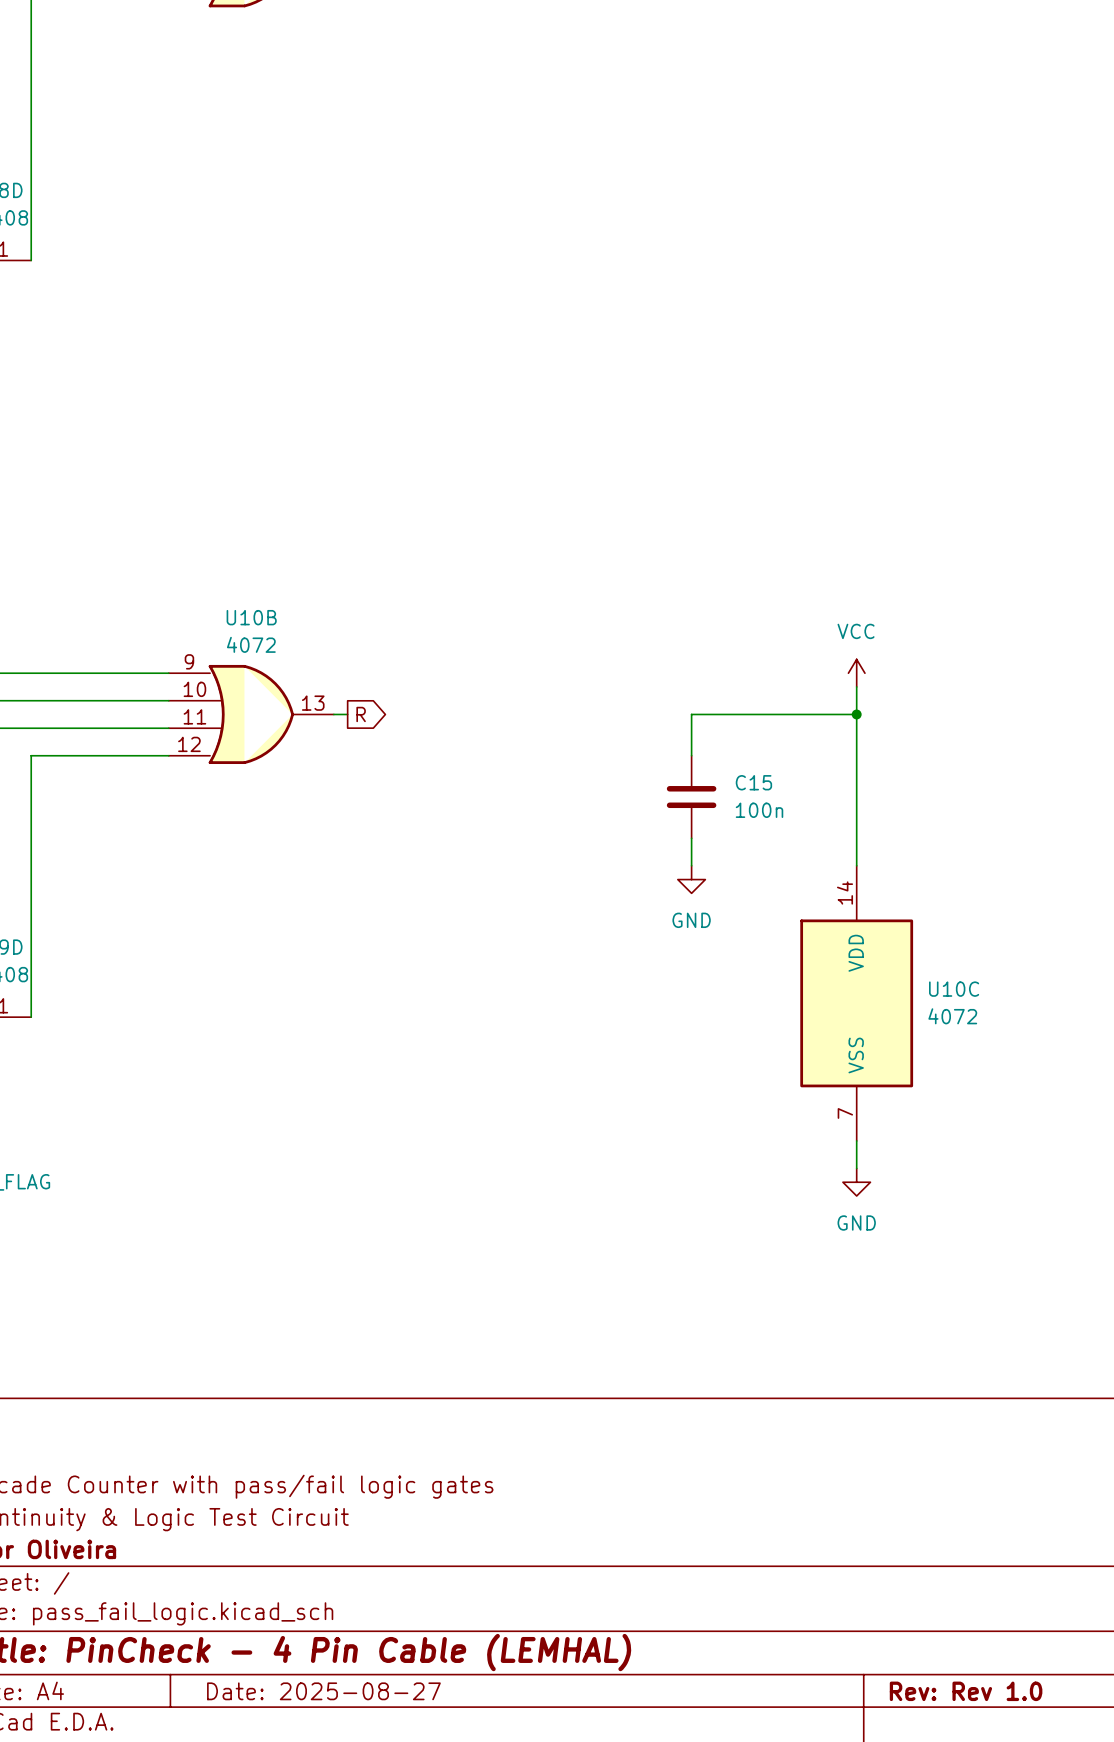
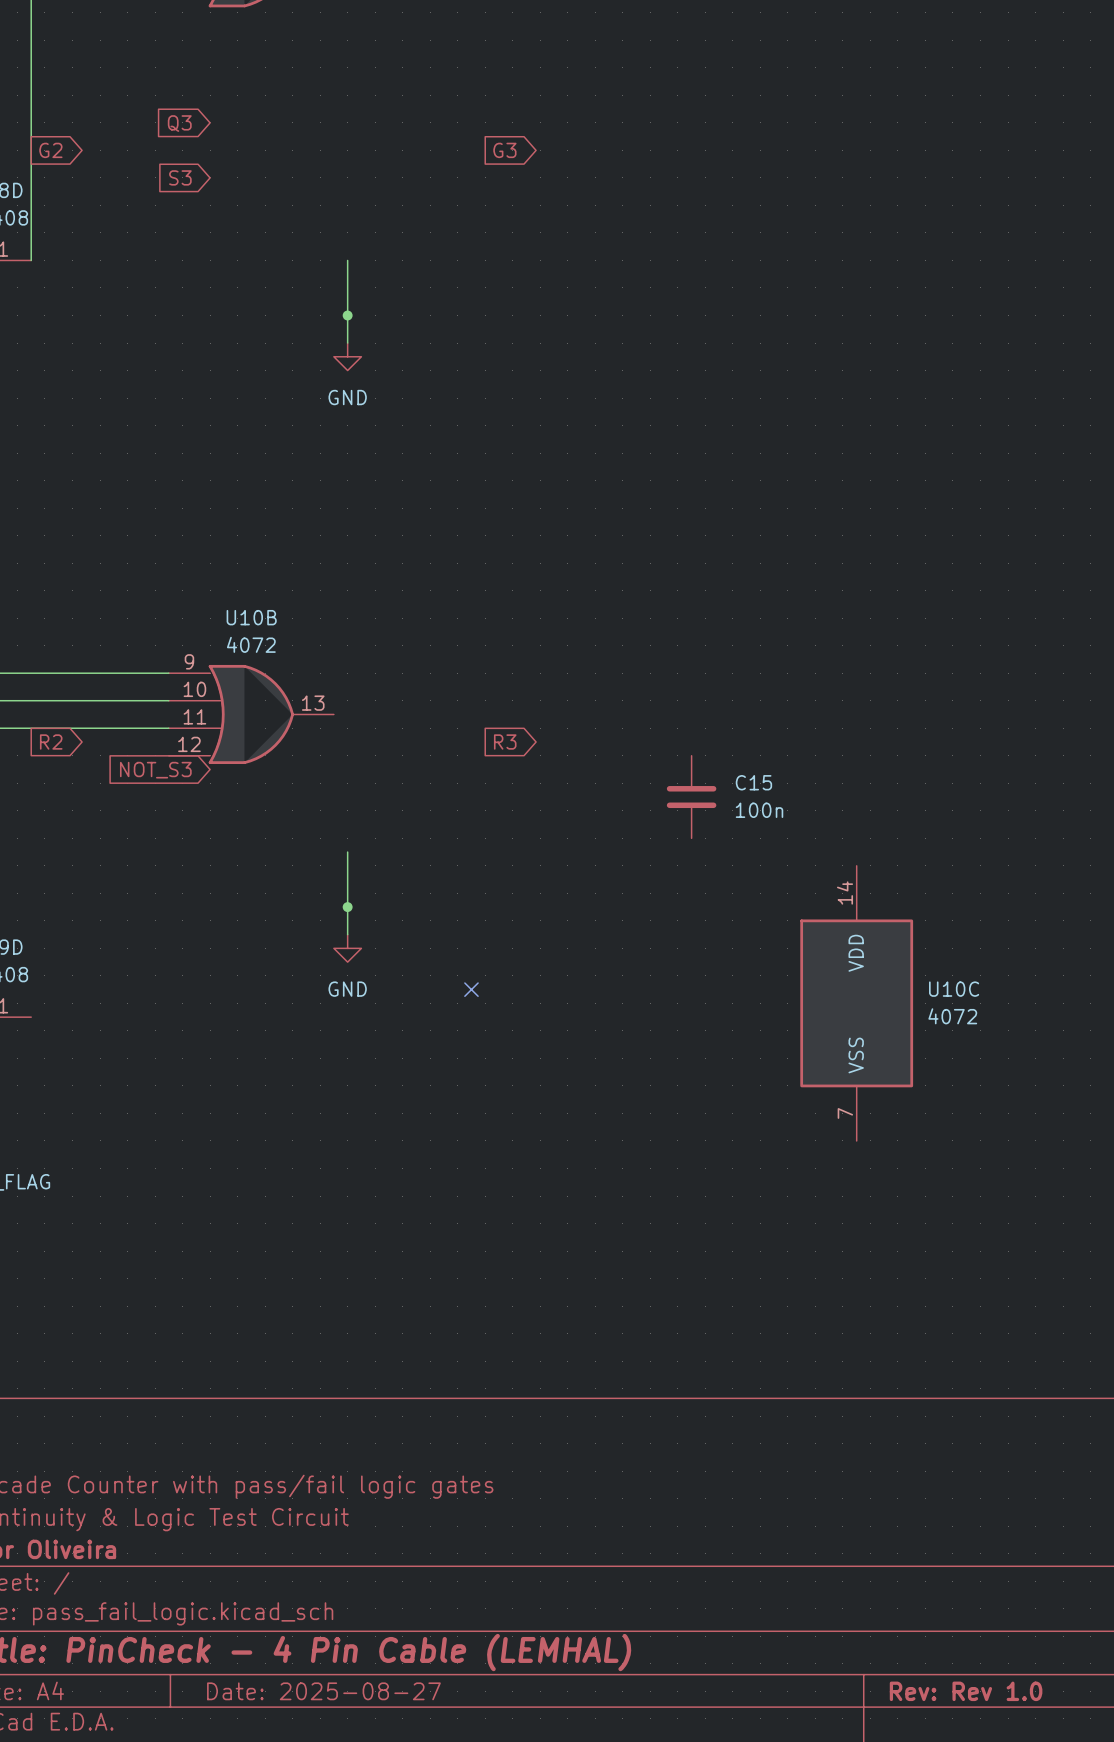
global label: none -> Q3 (179, 123)
global label: none -> G2 (50, 150)
global label: none -> G3 (504, 150)
global label: none -> S3 (180, 177)
wire: none -> (347, 260) (347, 343)
junction: none -> (347, 315)
power symbol: none -> GND (347, 356)
power symbol: VCC (856, 673) -> none
wire: (856, 686) (856, 865) -> none
wire: (333, 714) (347, 714) -> none
global label: R (361, 714) -> none
wire: (856, 714) (691, 714) (691, 755) -> none
junction: (856, 714) -> none
global label: none -> R2 (51, 741)
global label: none -> R3 (505, 741)
wire: (168, 755) (31, 755) (31, 1017) -> none
global label: none -> NOT_S3 (155, 770)
wire: (691, 838) (691, 865) -> none
wire: none -> (347, 852) (347, 934)
power symbol: GND (691, 879) -> none
junction: none -> (347, 907)
power symbol: none -> GND (347, 948)
no-connect mark: none -> (471, 989)
wire: (856, 1140) (856, 1168) -> none
power symbol: GND (856, 1182) -> none

